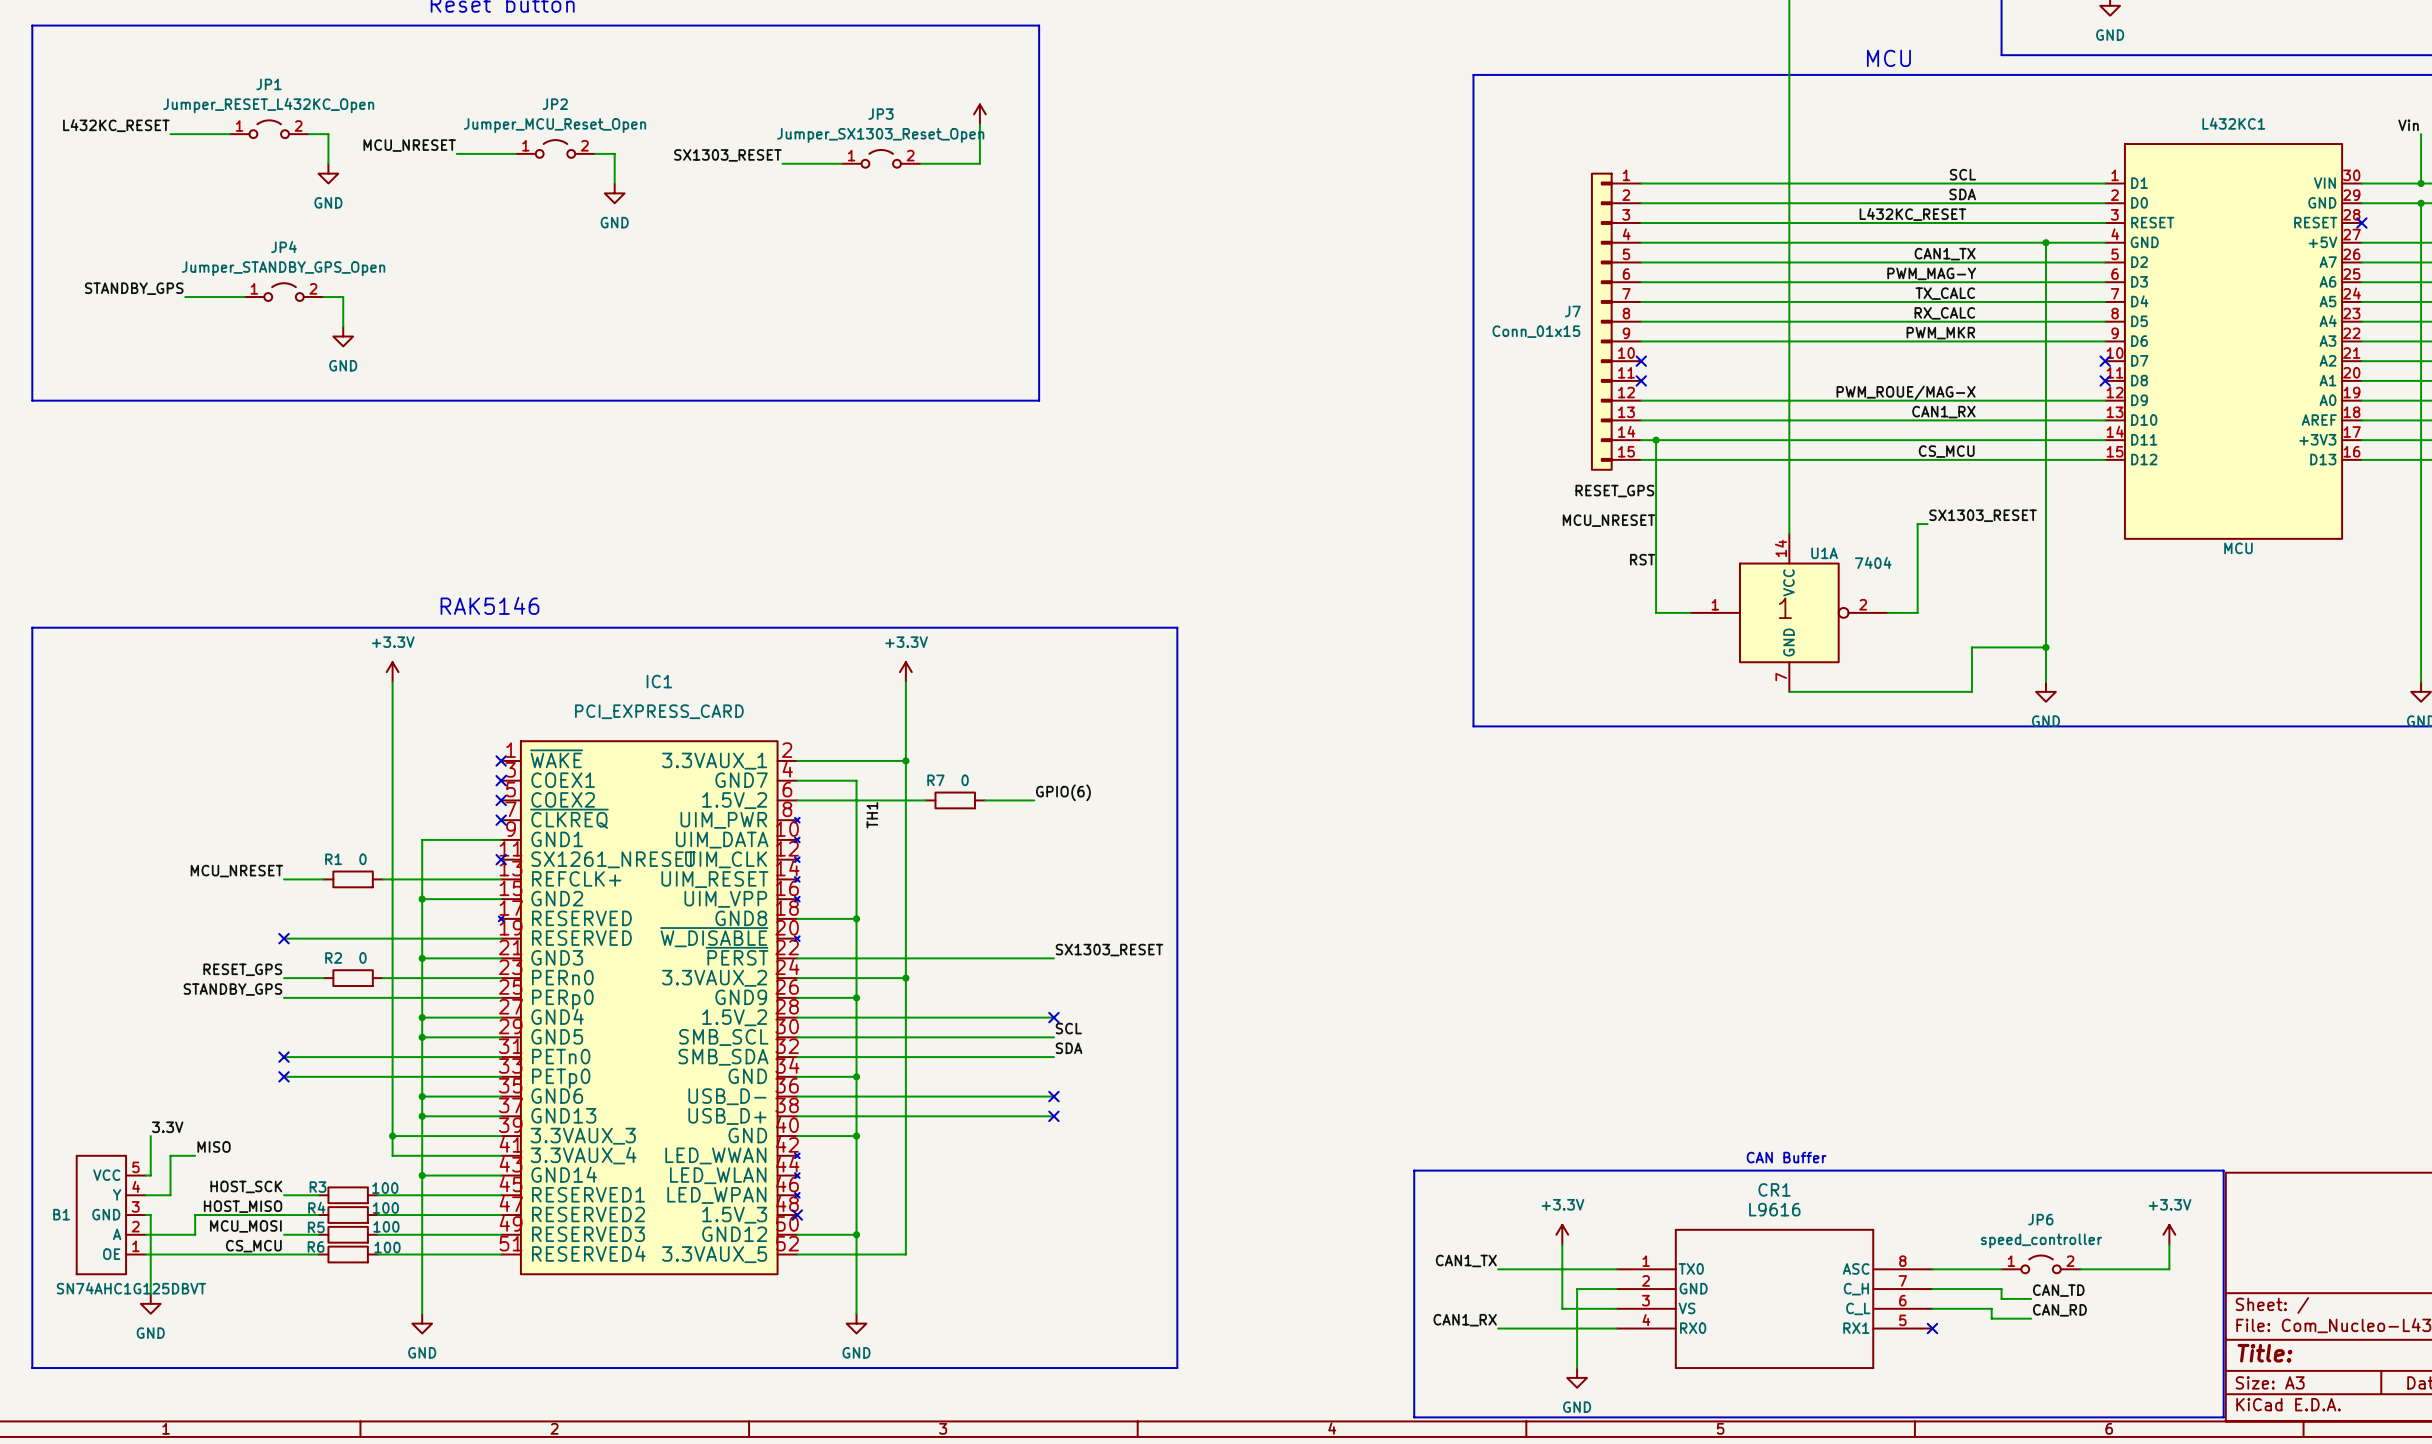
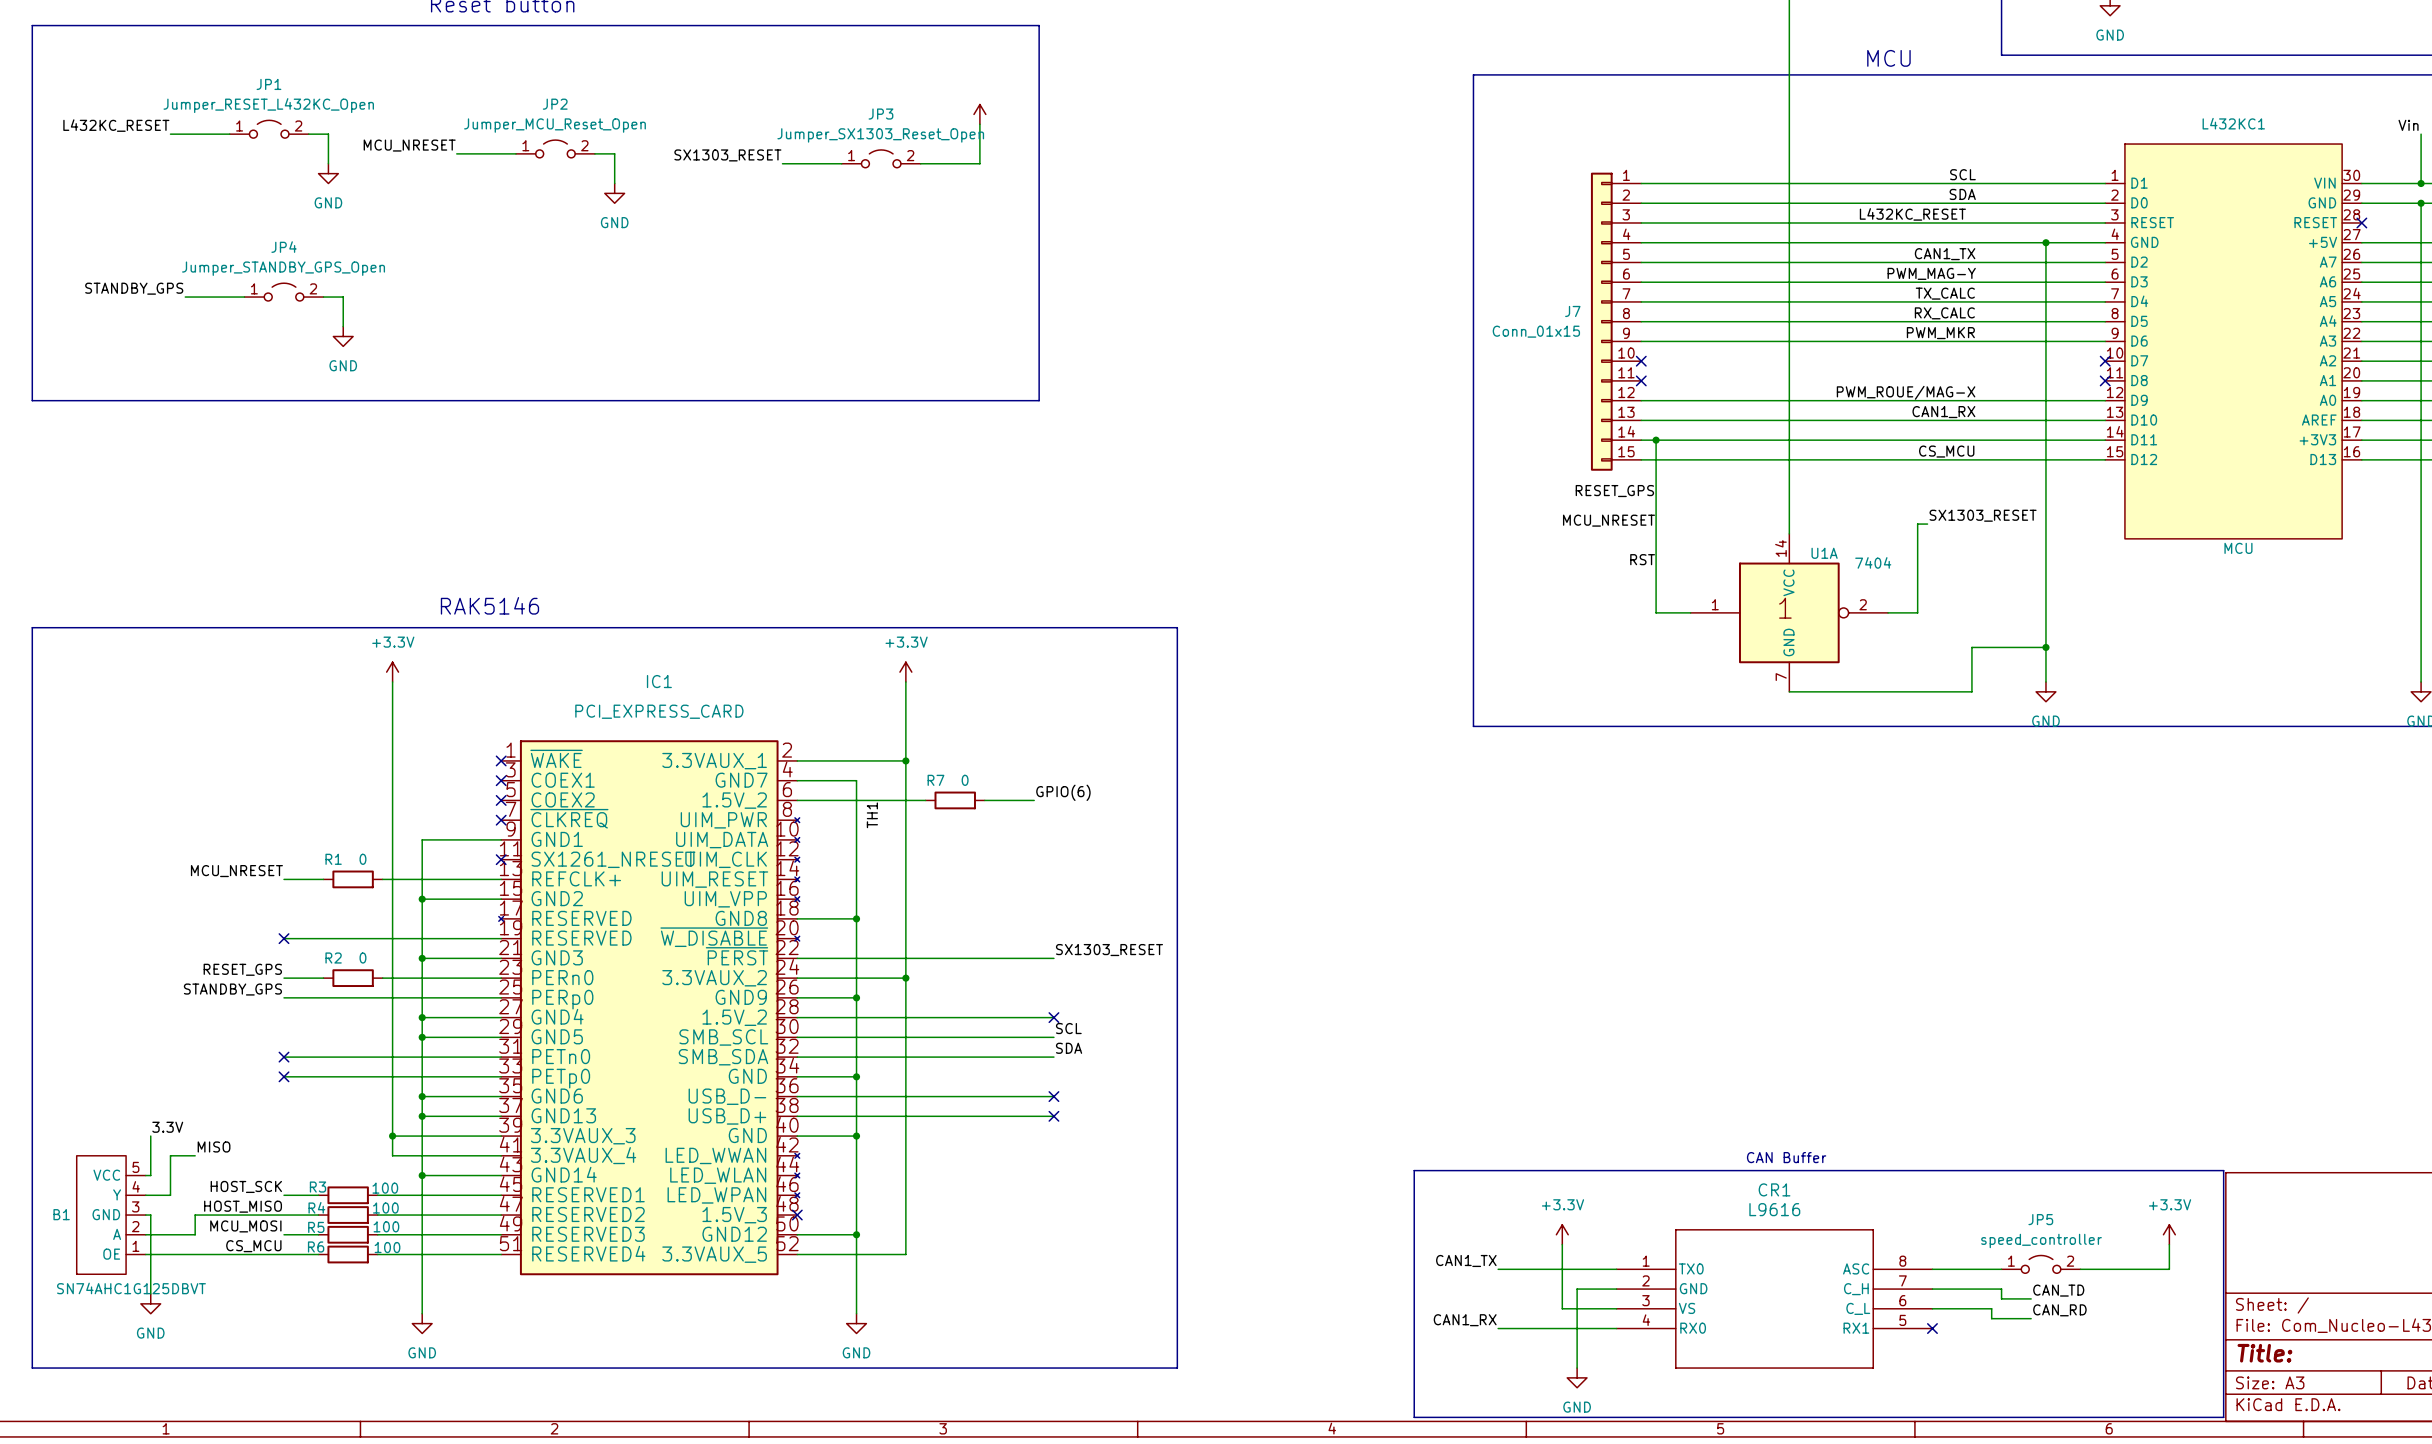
JP6 name: JP6 (2040, 1219) -> JP5 (2040, 1219)

